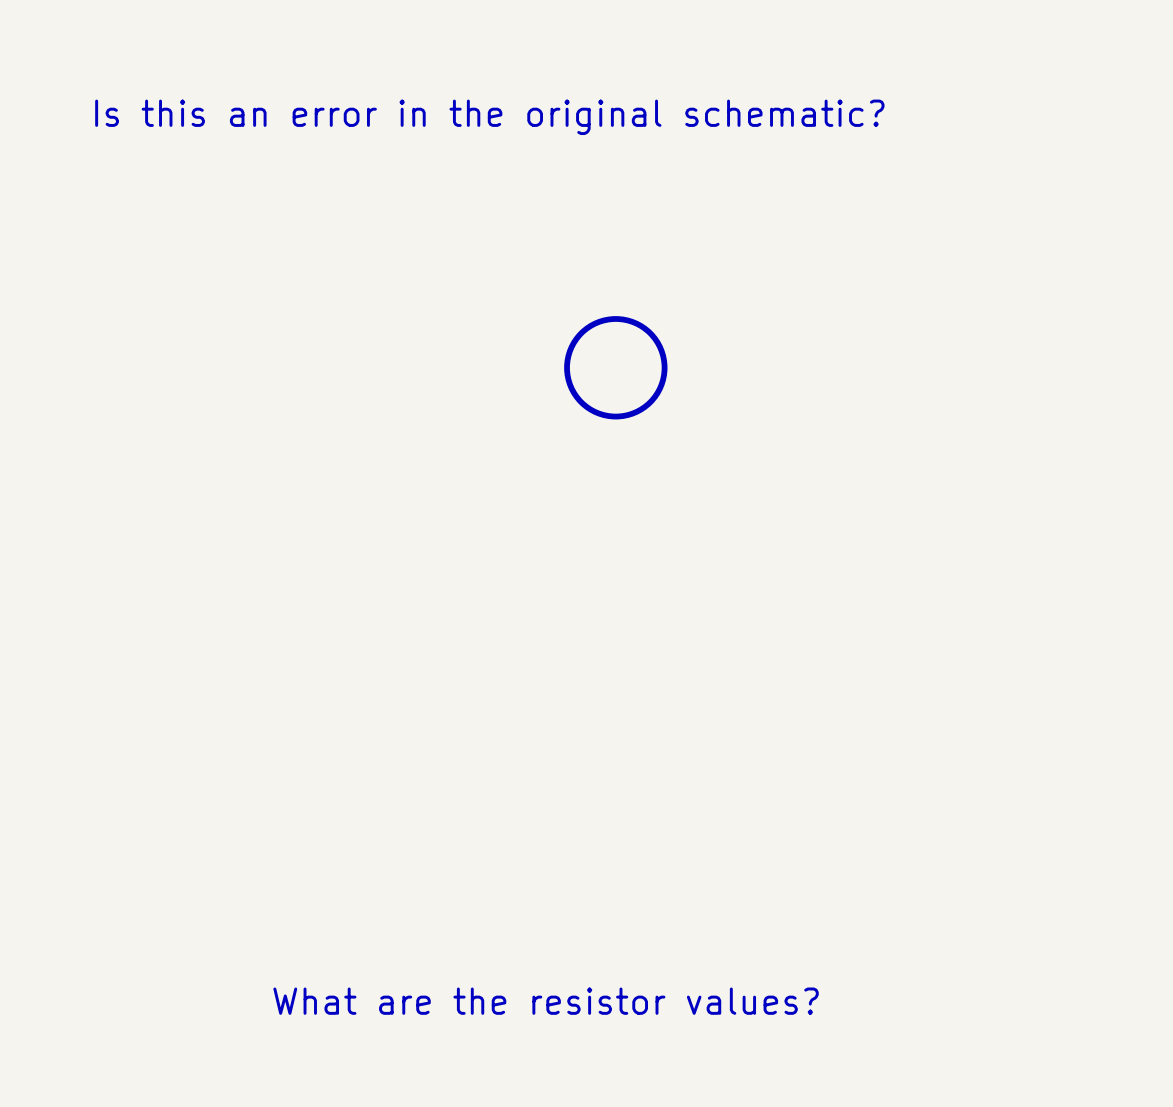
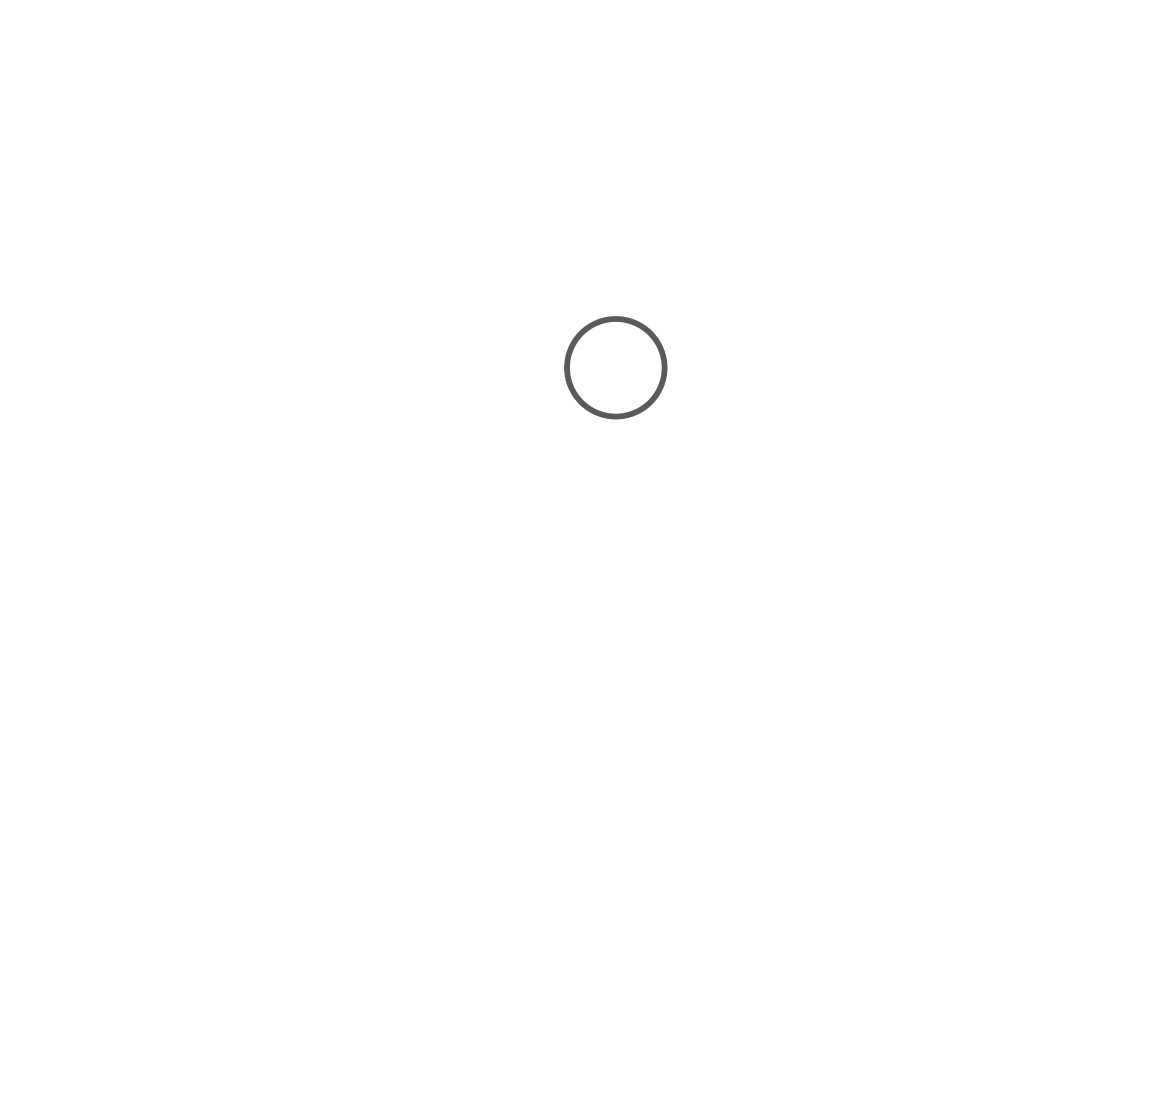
text: Is this an error in the original schematic? (489, 117) -> none
text: What are the resistor values? (546, 1001) -> none

